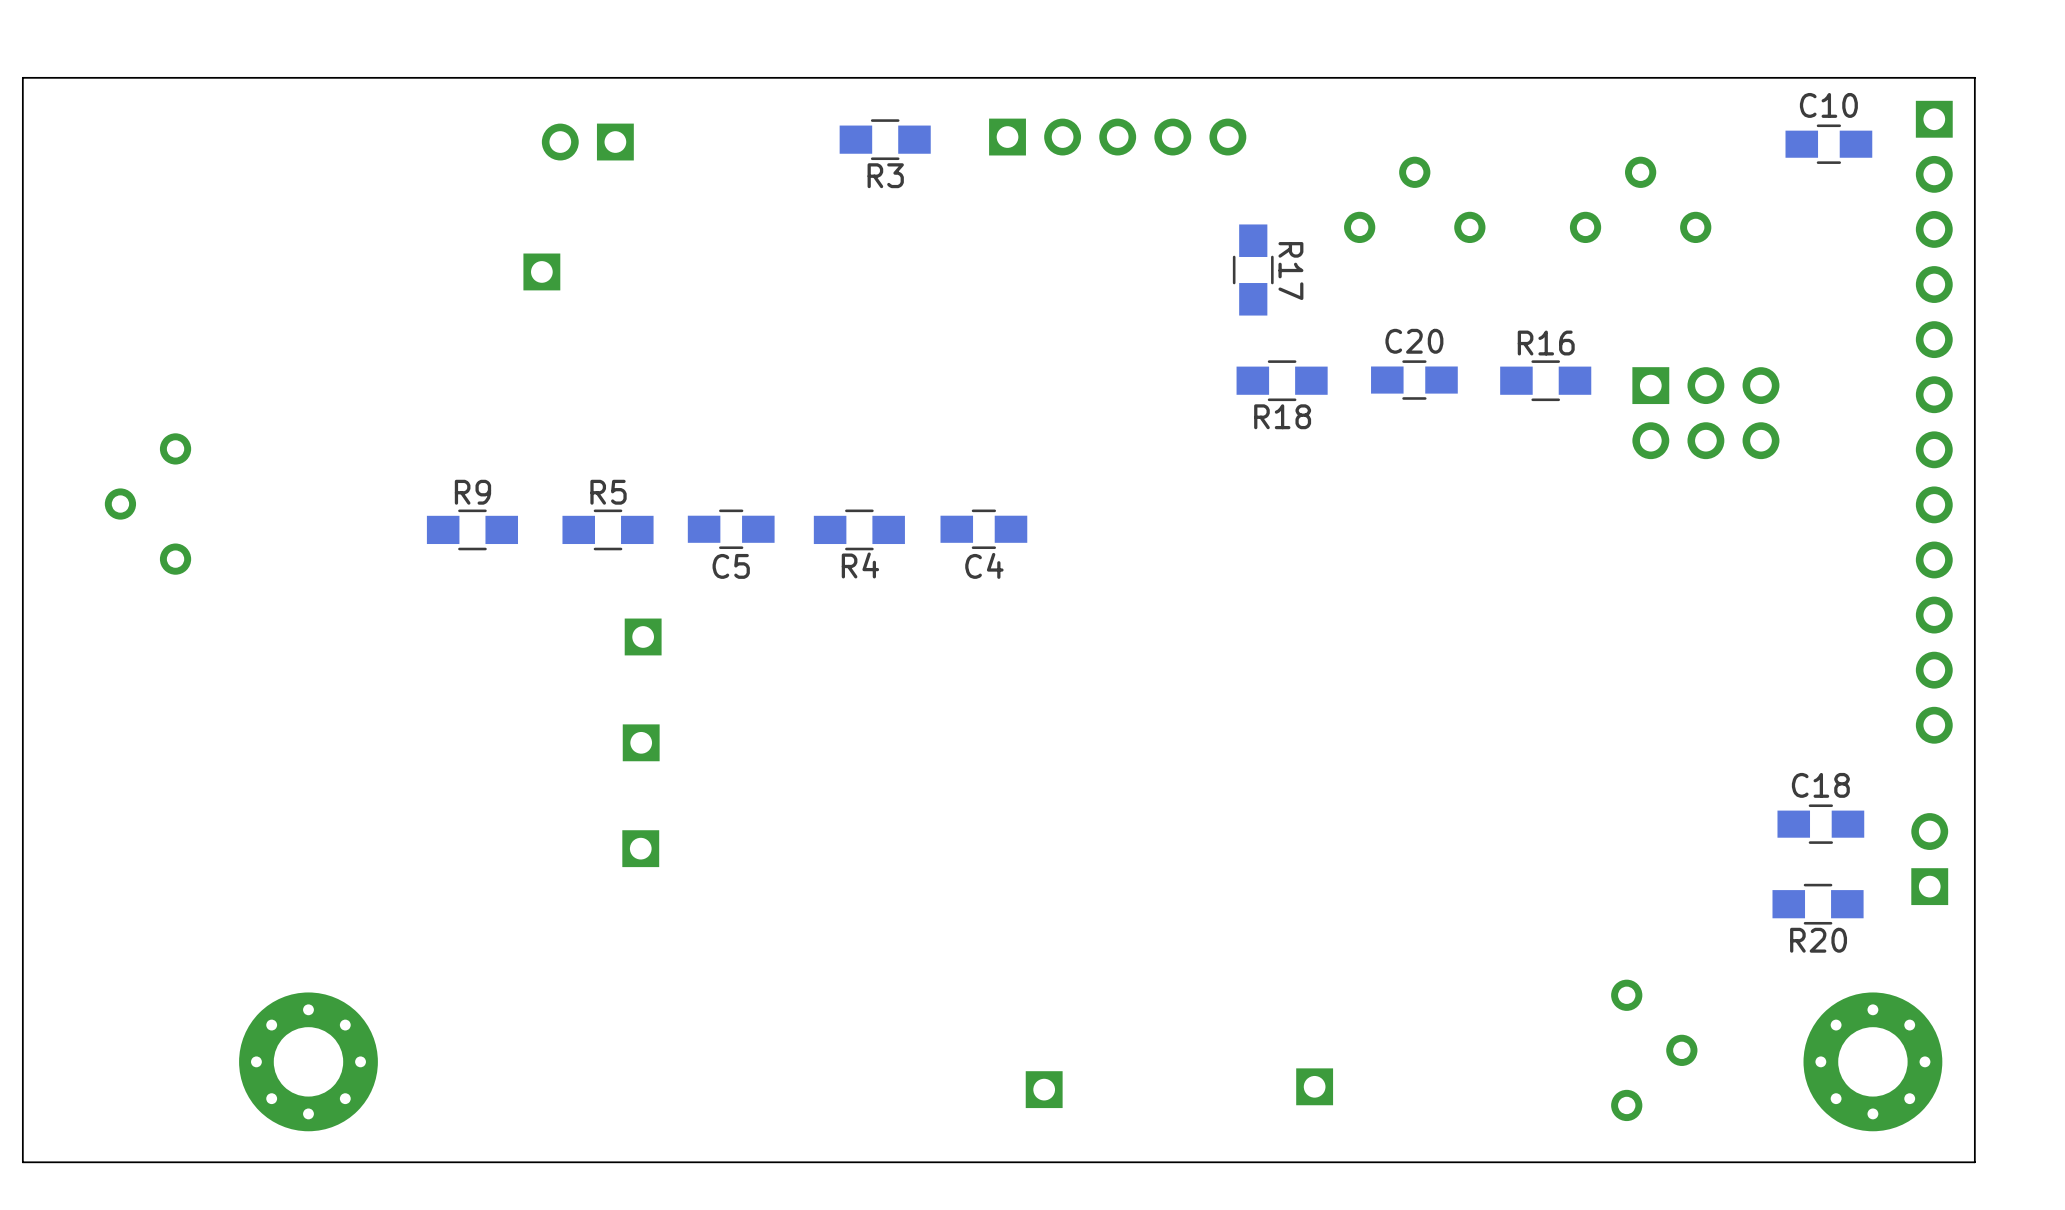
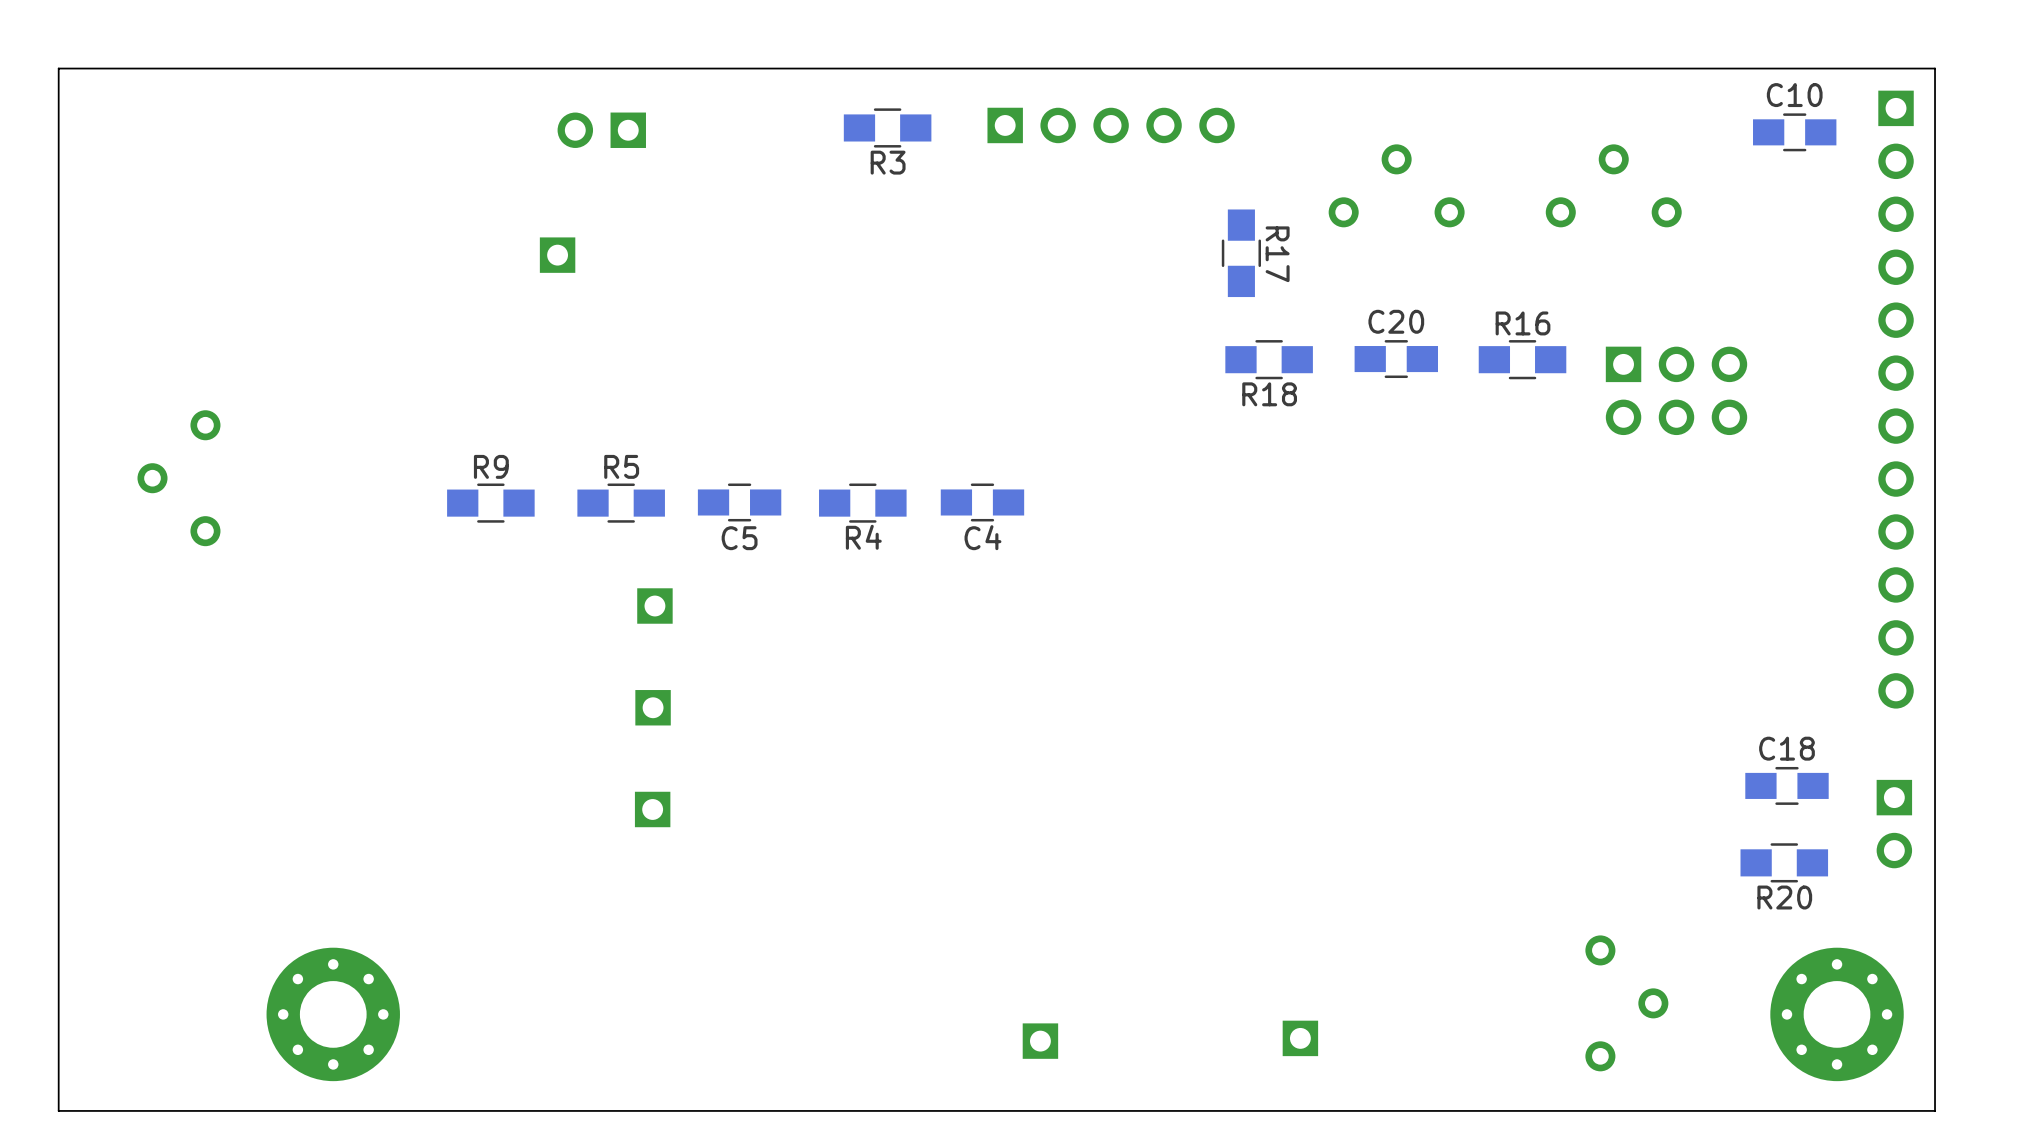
part rotation: 0° (1929, 859) -> 180° (1894, 824)

